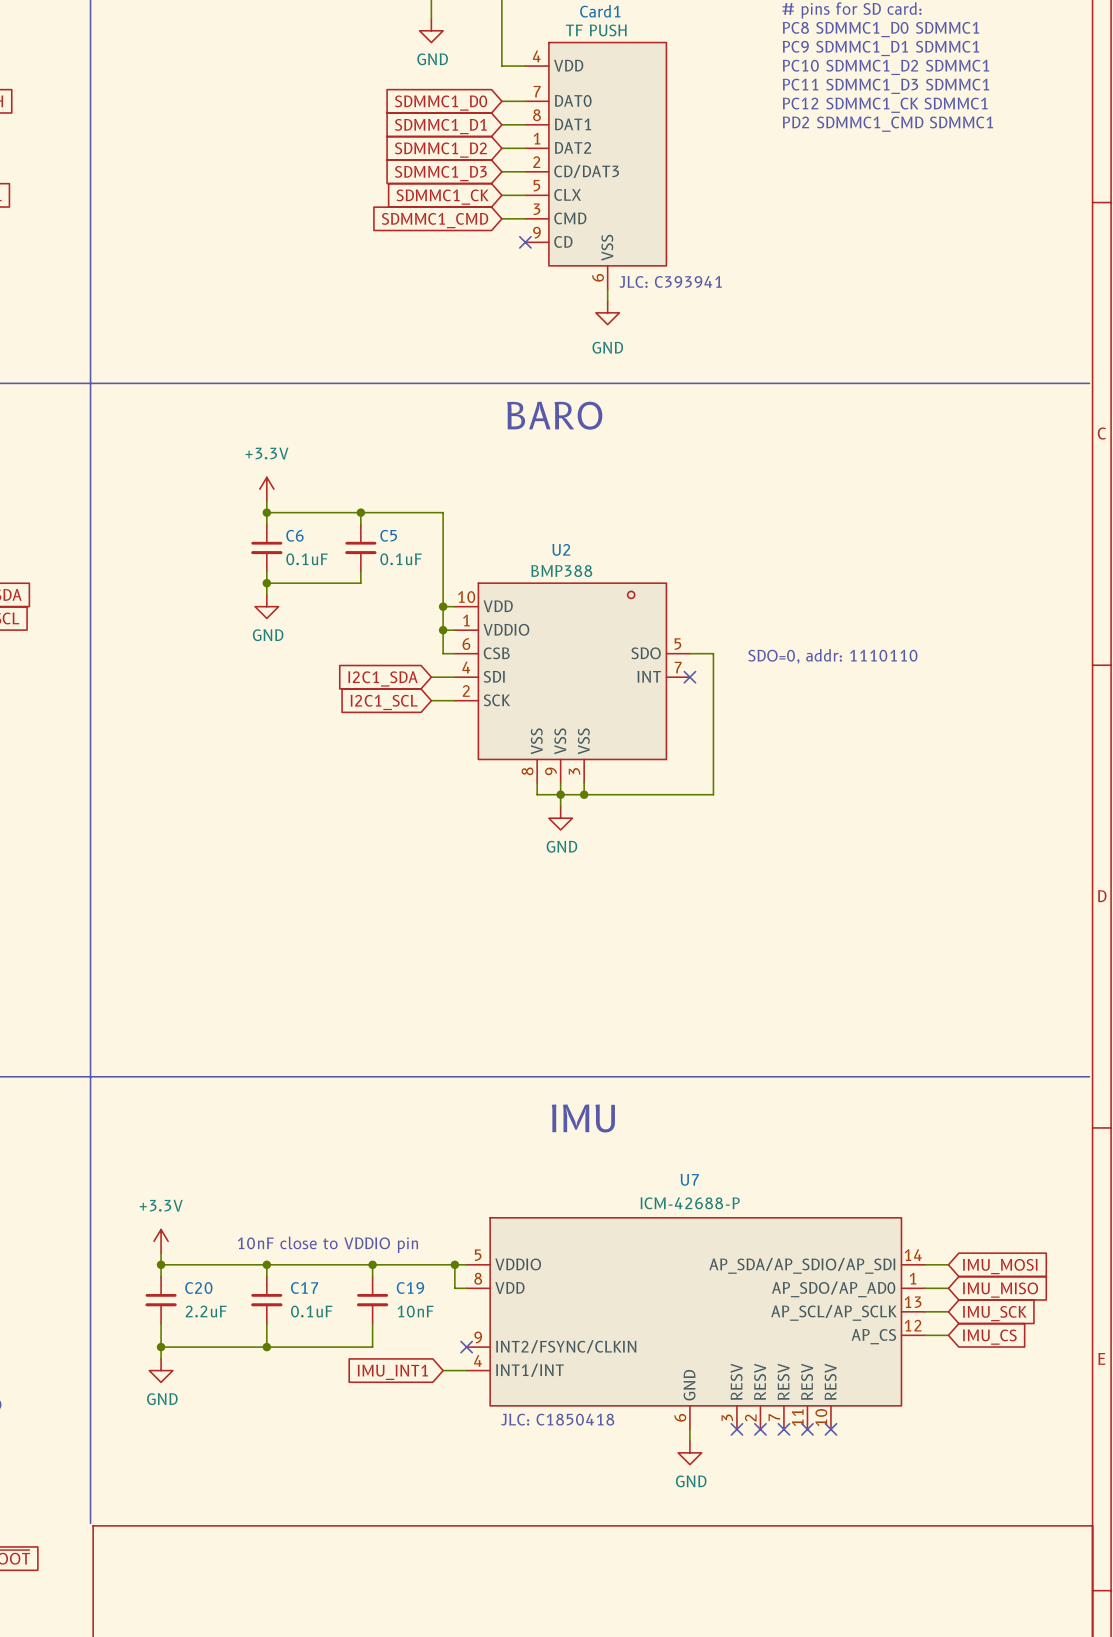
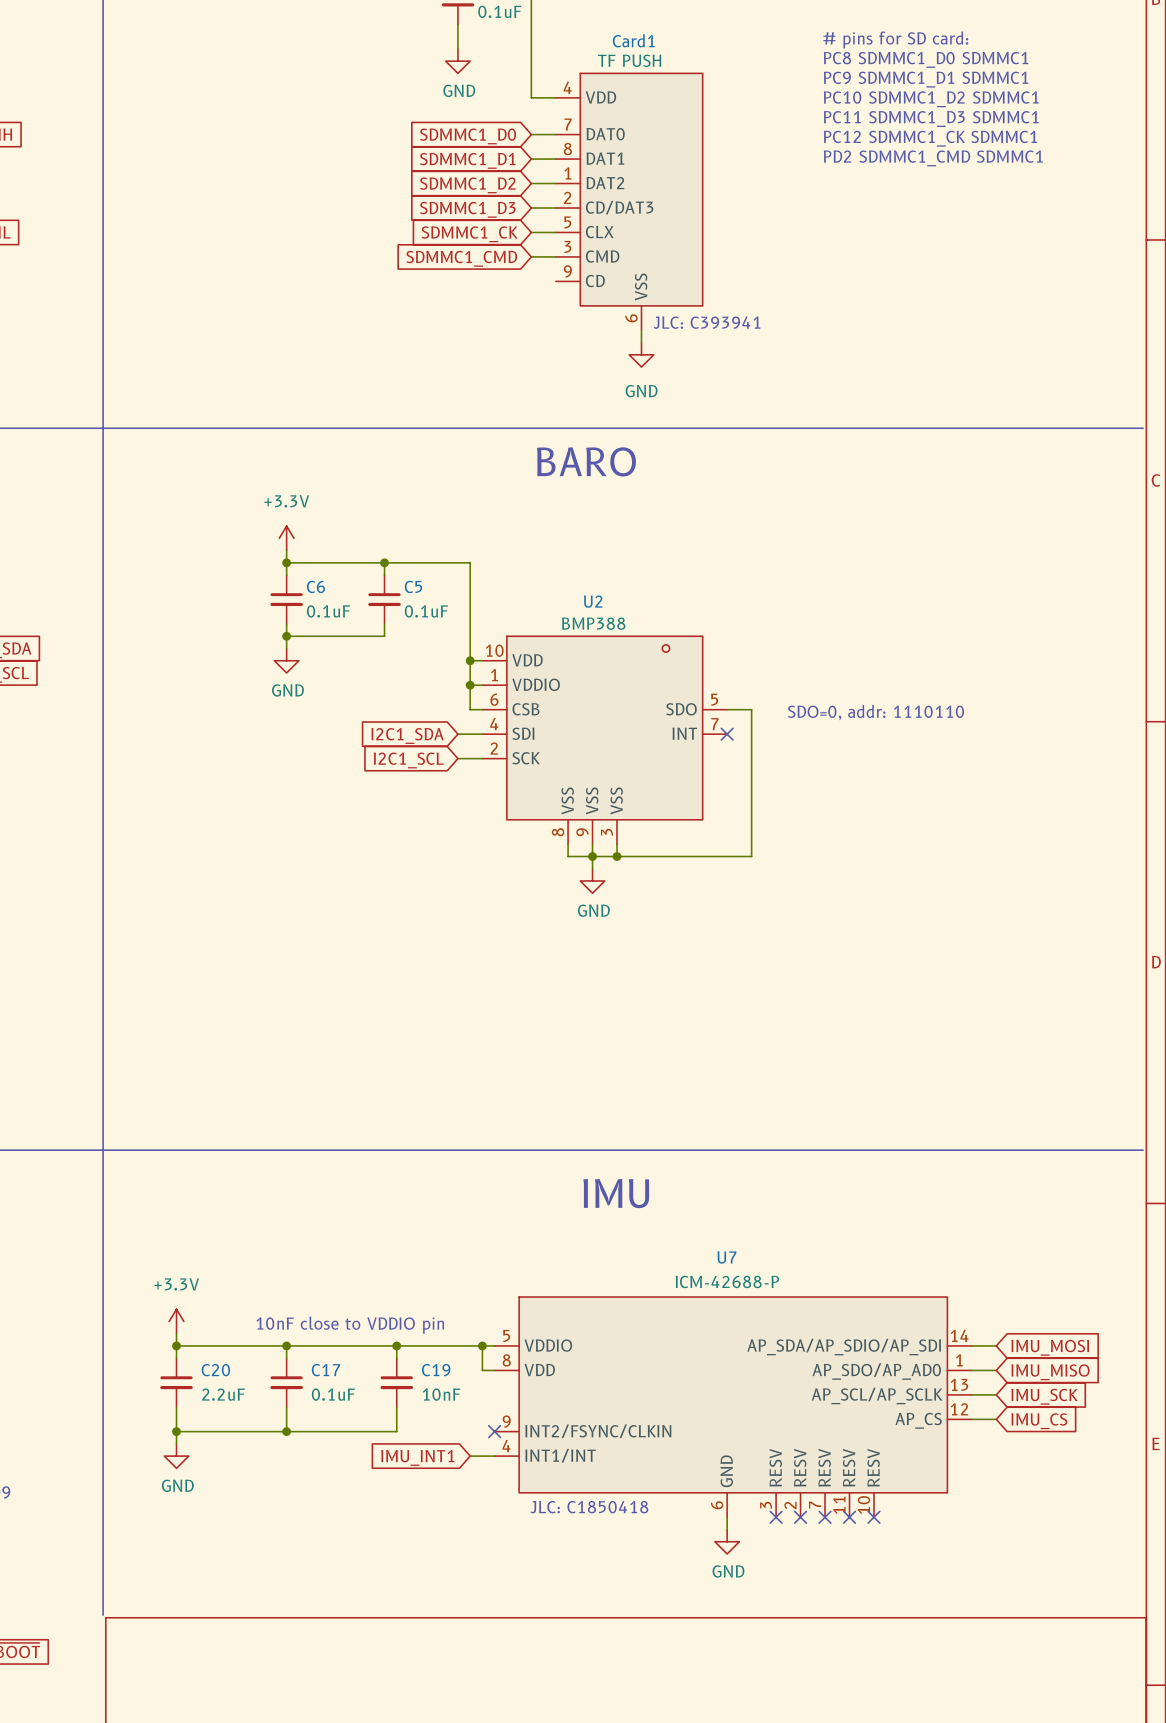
no-connect mark: (525, 242) -> none

